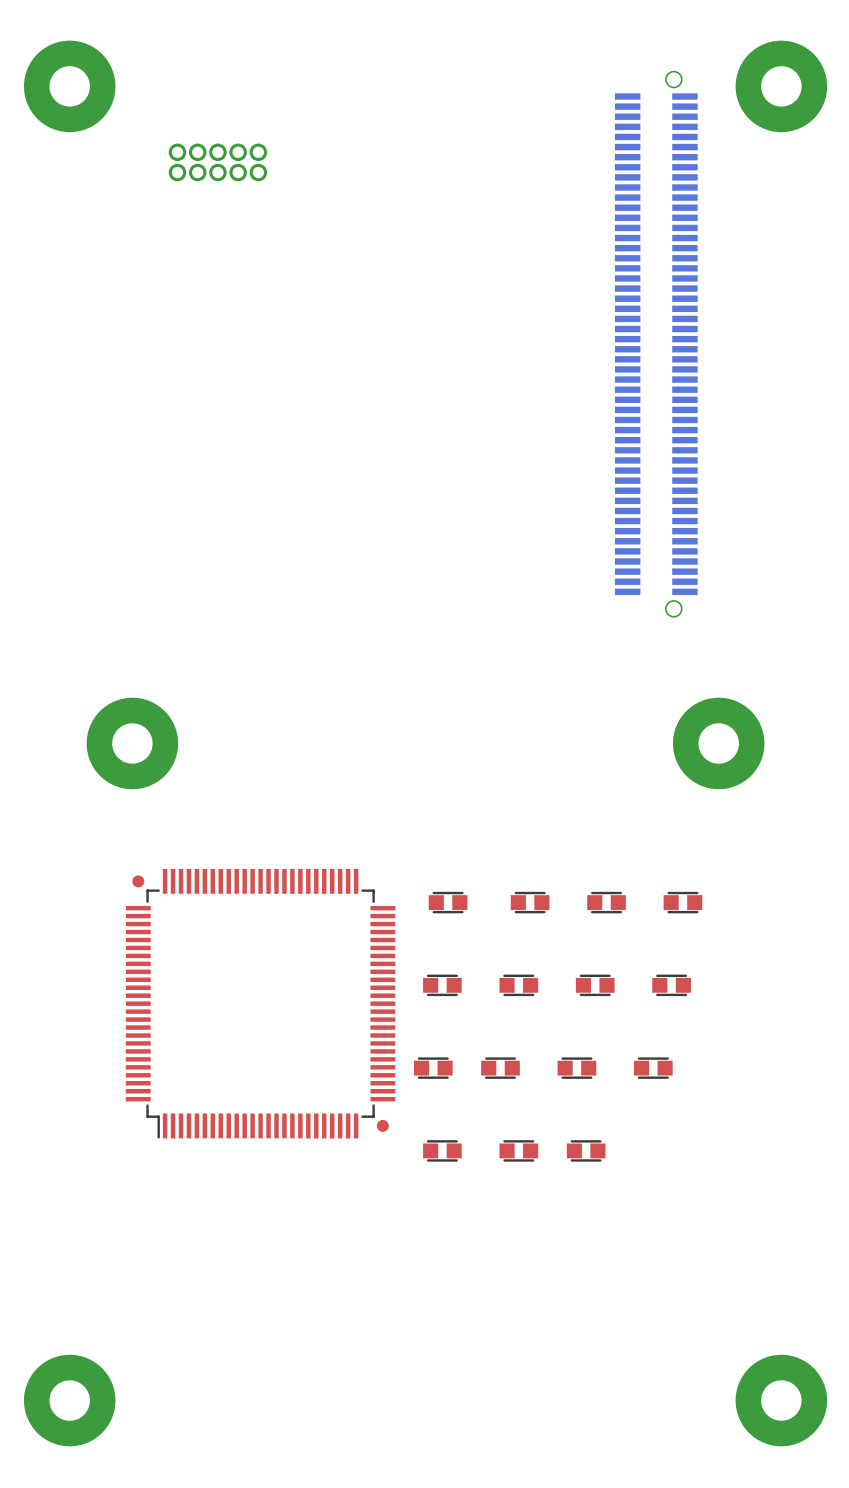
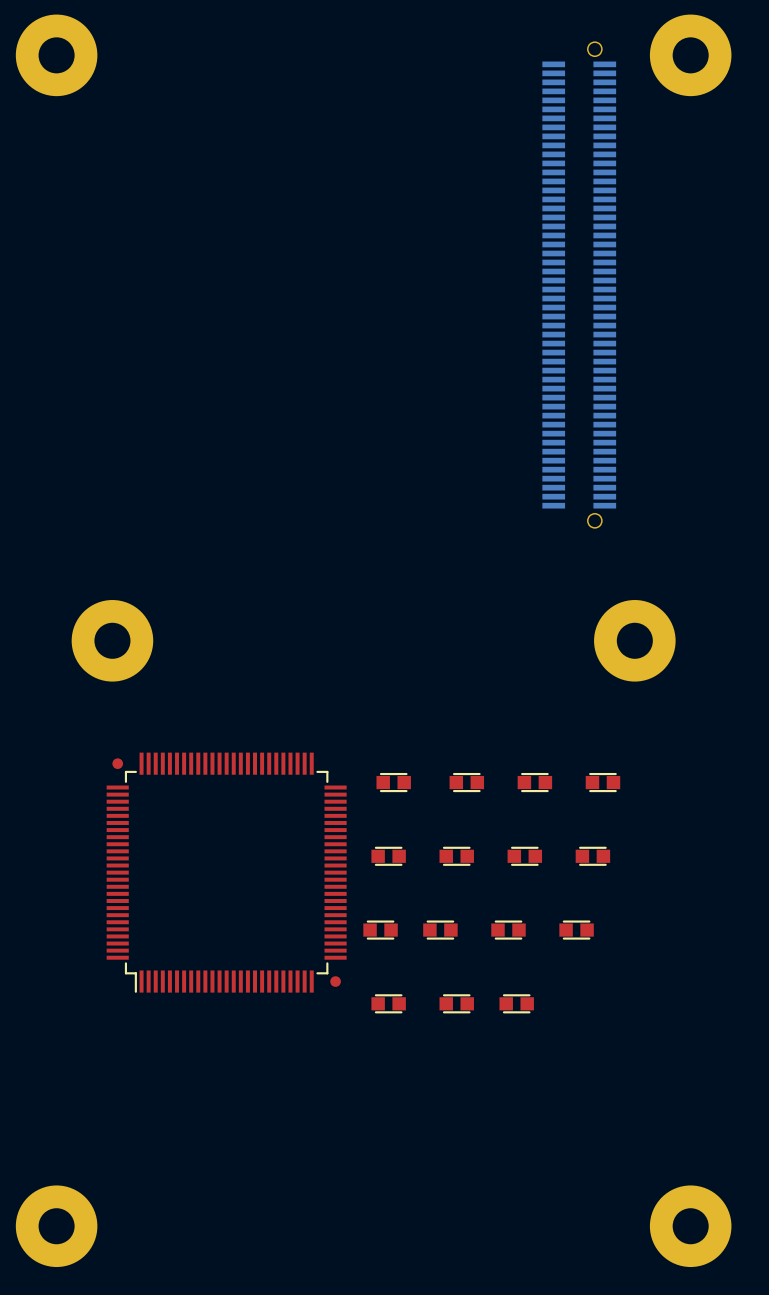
part: (217, 162) -> none

